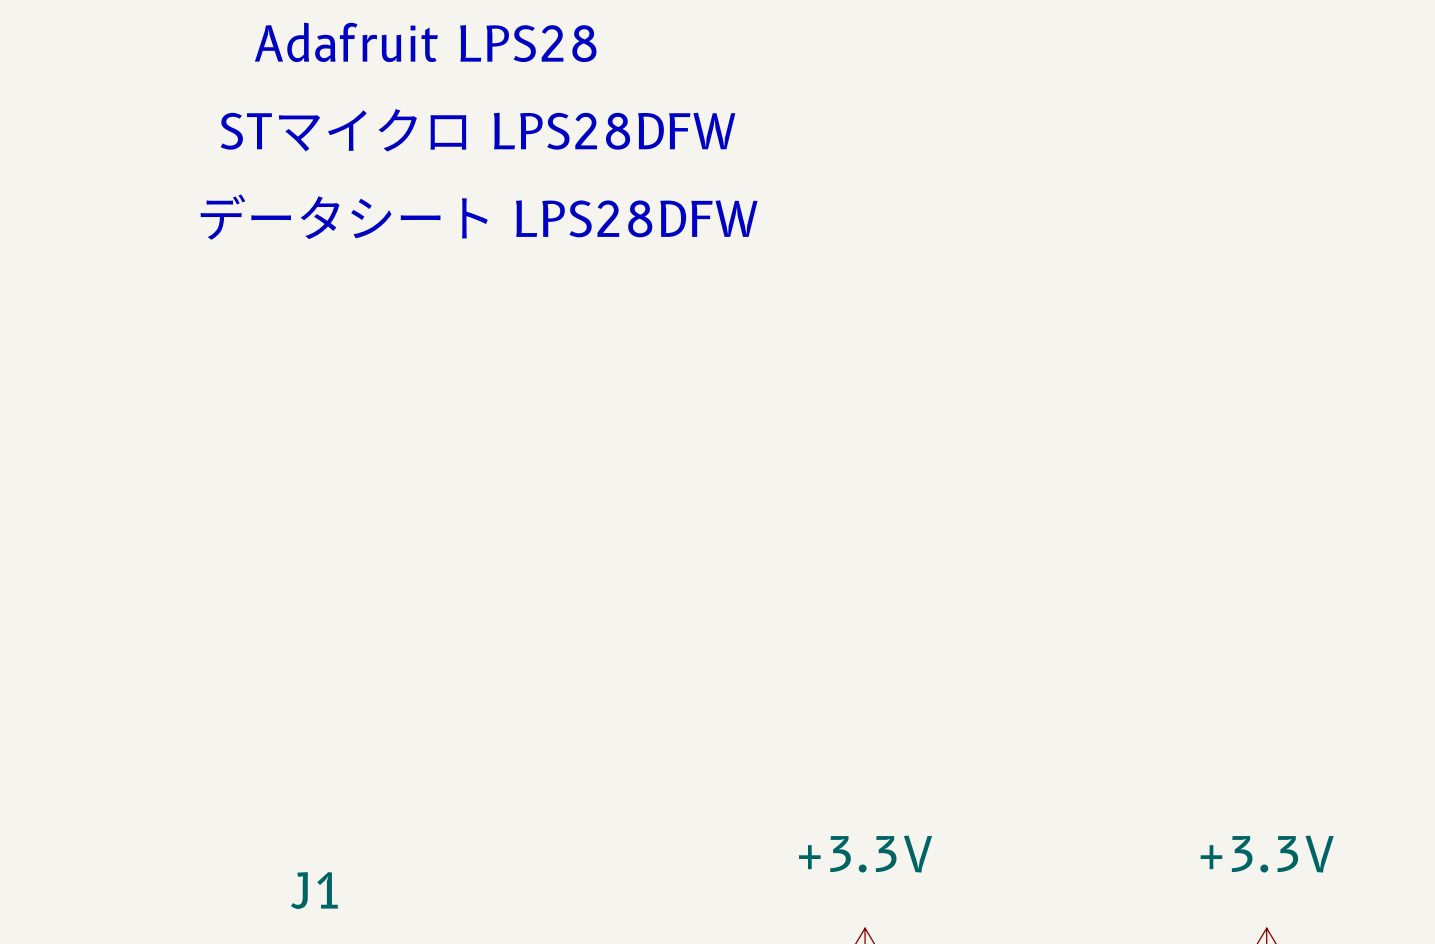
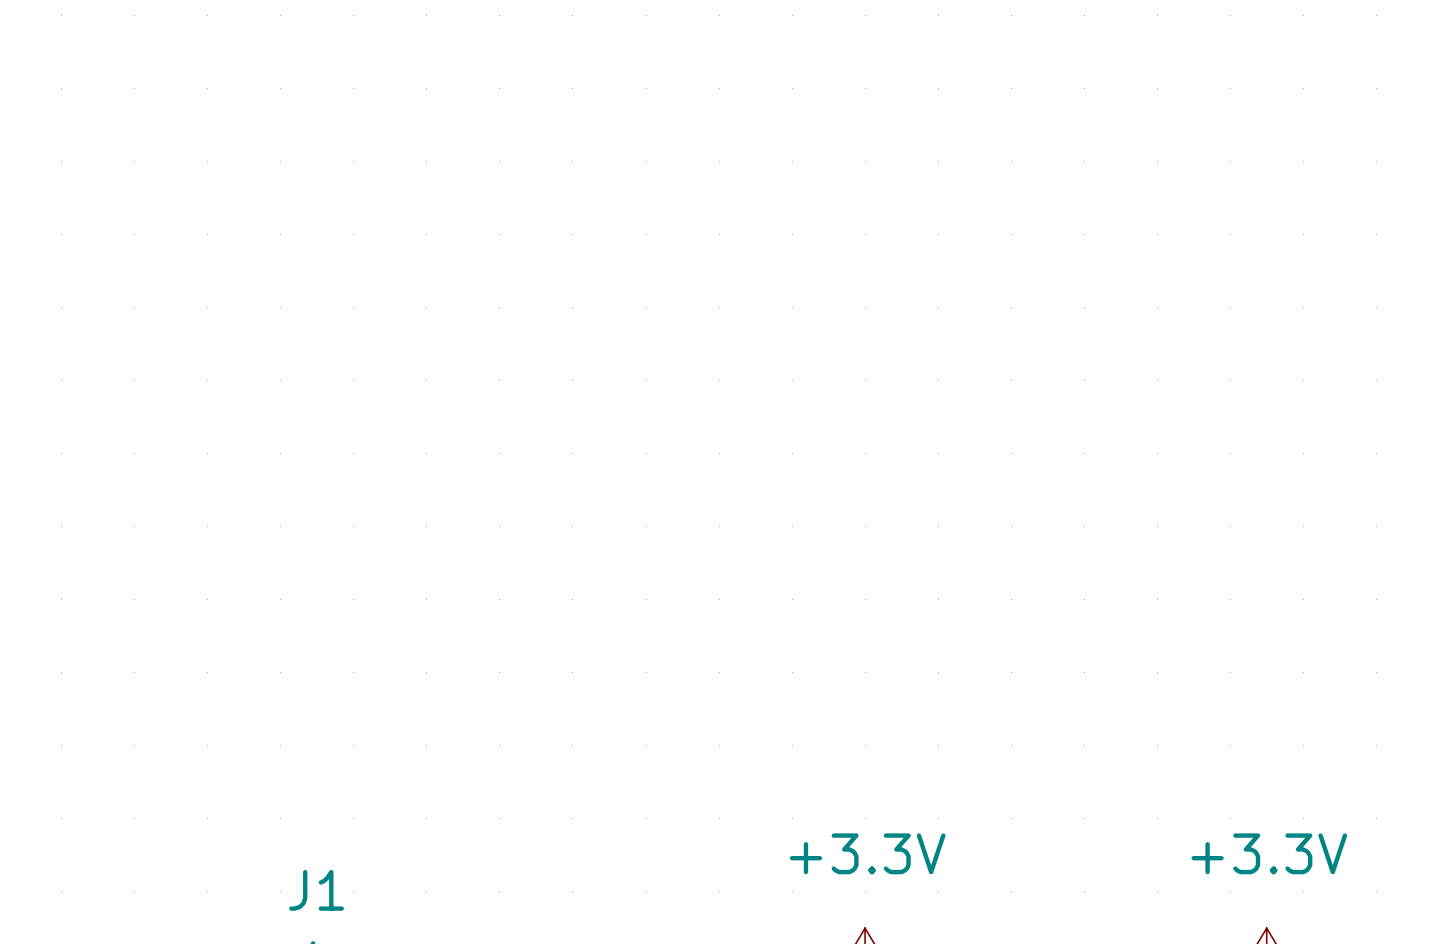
text: Adafruit LPS28 (425, 42) -> none
text: STマイクロ LPS28DFW (478, 130) -> none
text: データシート LPS28DFW (479, 217) -> none

